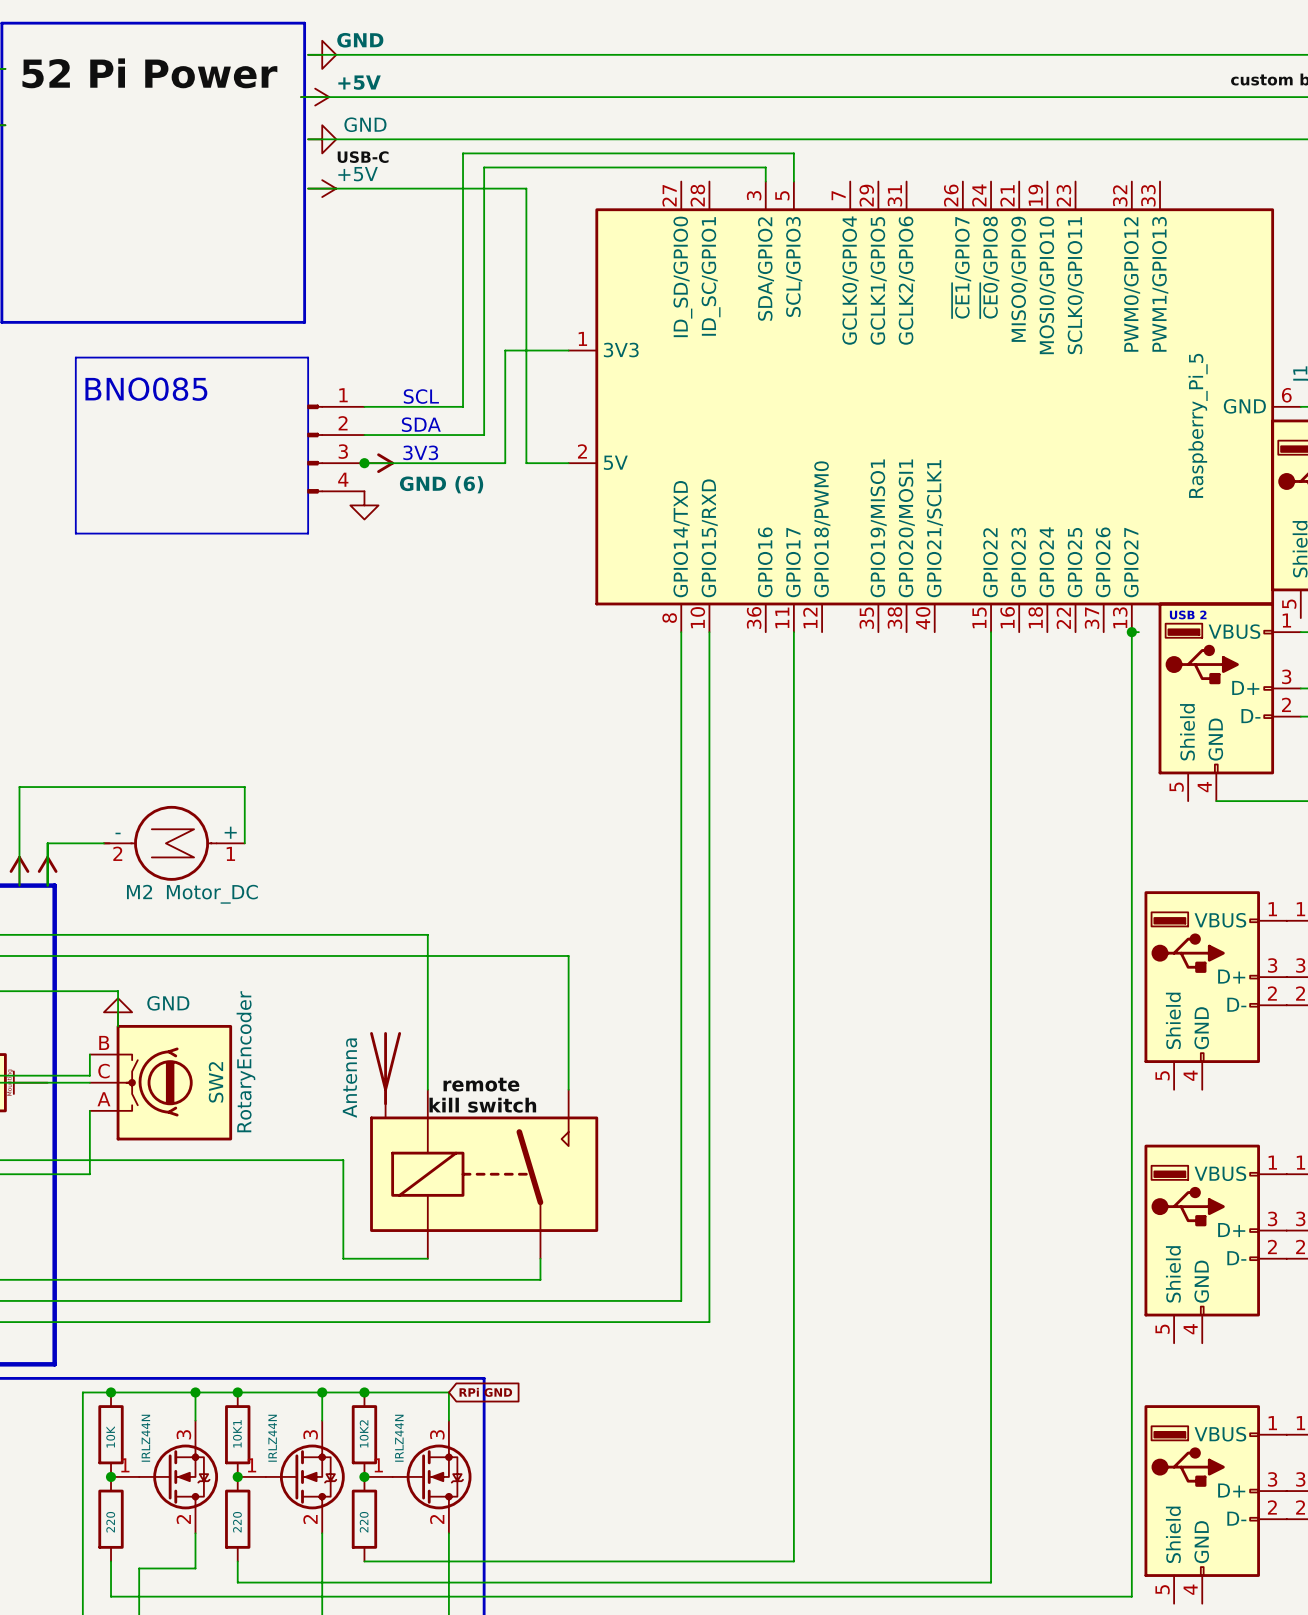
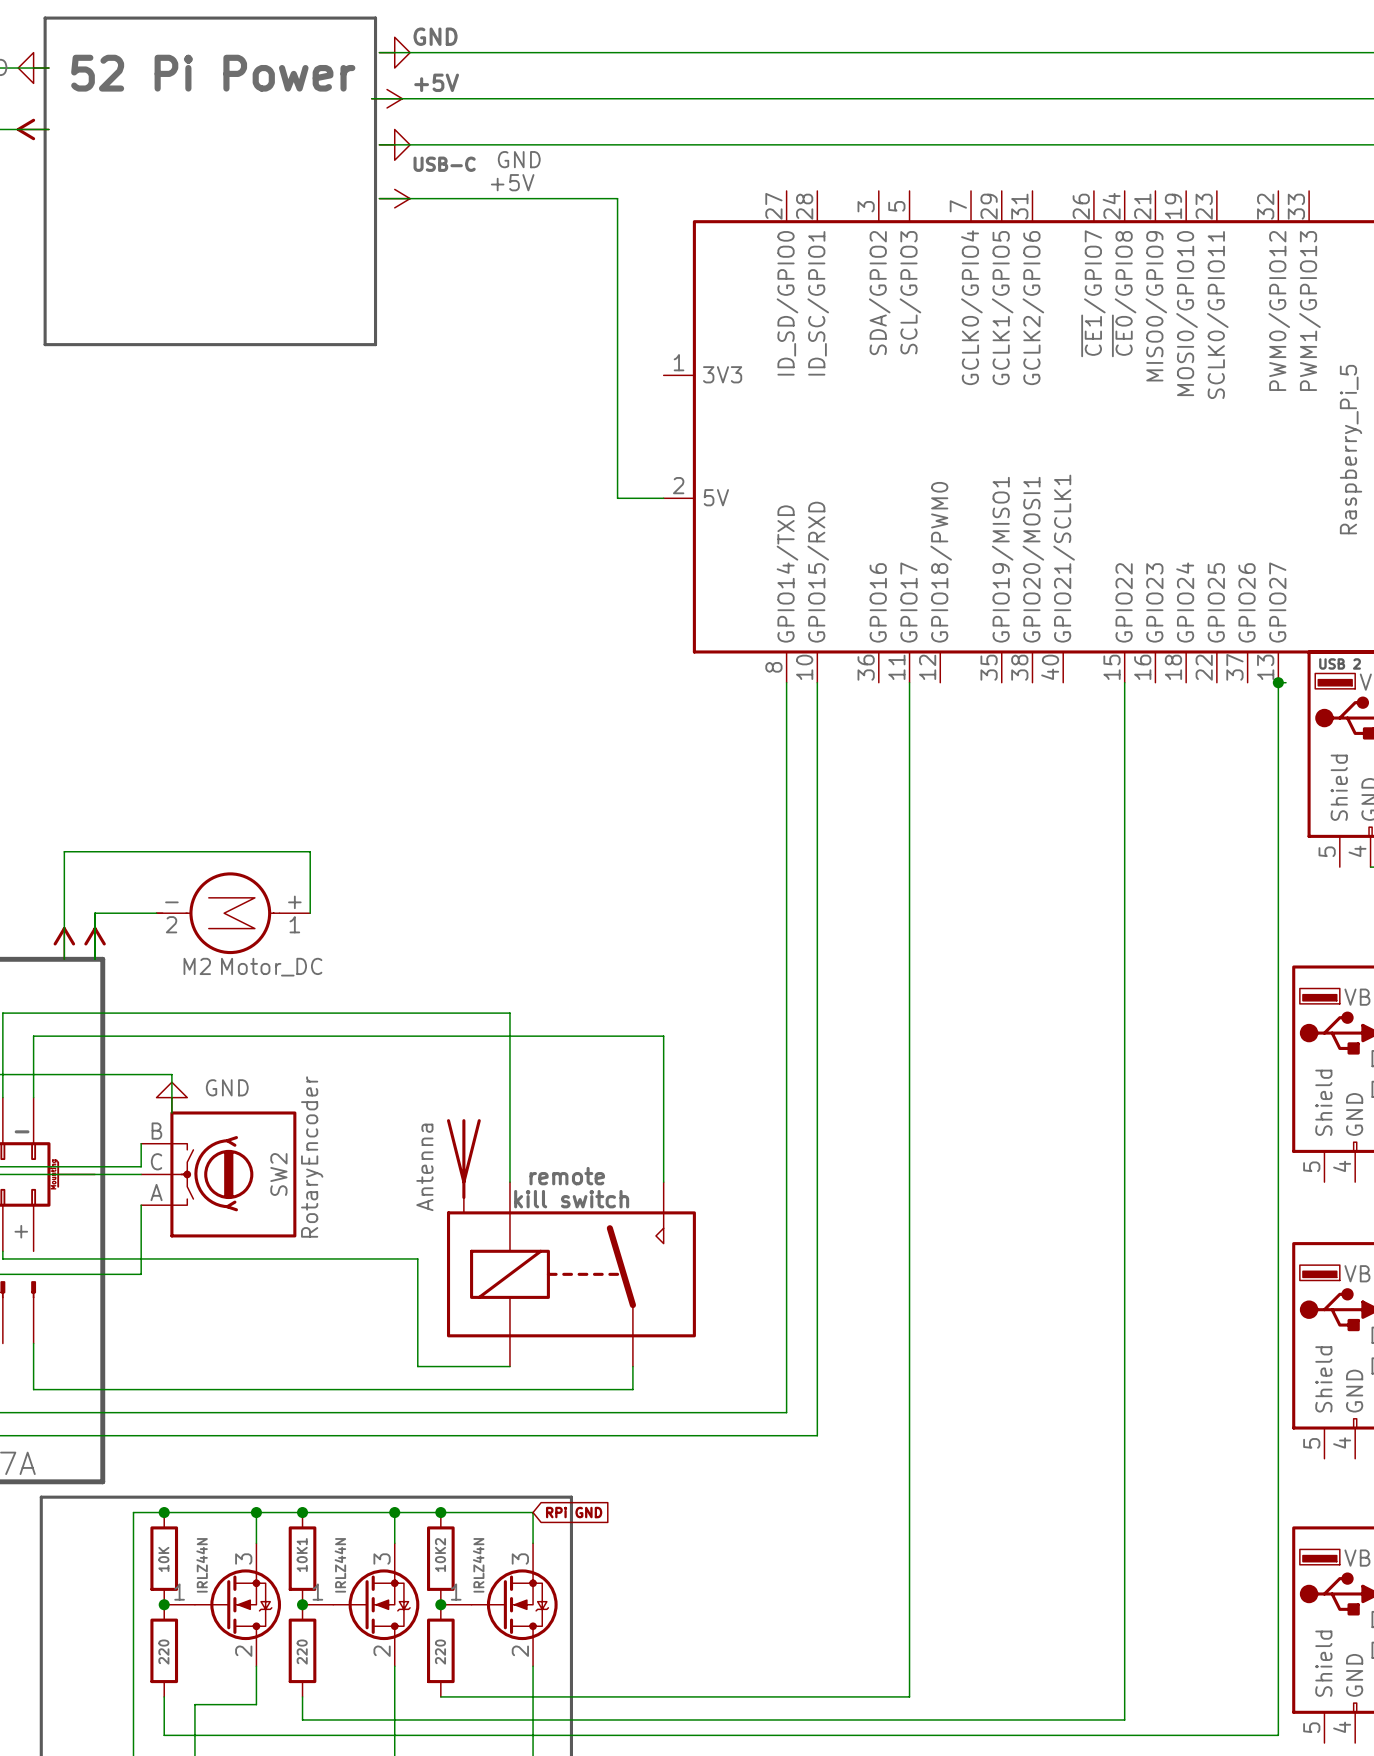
power symbol text position: GND (365, 124) -> GND (519, 159)
power symbol text position: +5V (358, 174) -> +5V (512, 182)
wire: (765, 181) (765, 167) (484, 167) (484, 435) (364, 435) -> none
wire: (793, 181) (793, 153) (463, 153) (463, 406) (364, 406) -> none
wire: (568, 350) (505, 350) (505, 463) (364, 463) -> none
line: (75, 357) (308, 357) (308, 533) (75, 533) (75, 357) -> none
text: BNO085 (146, 389) -> none
text: SCL (421, 396) -> none
text: SDA (421, 424) -> none
part: (335, 449) -> none
text: 3V3 (420, 452) -> none
junction: (364, 463) -> none
power symbol: (379, 463) -> none
power symbol: GND (6) (364, 505) -> none

